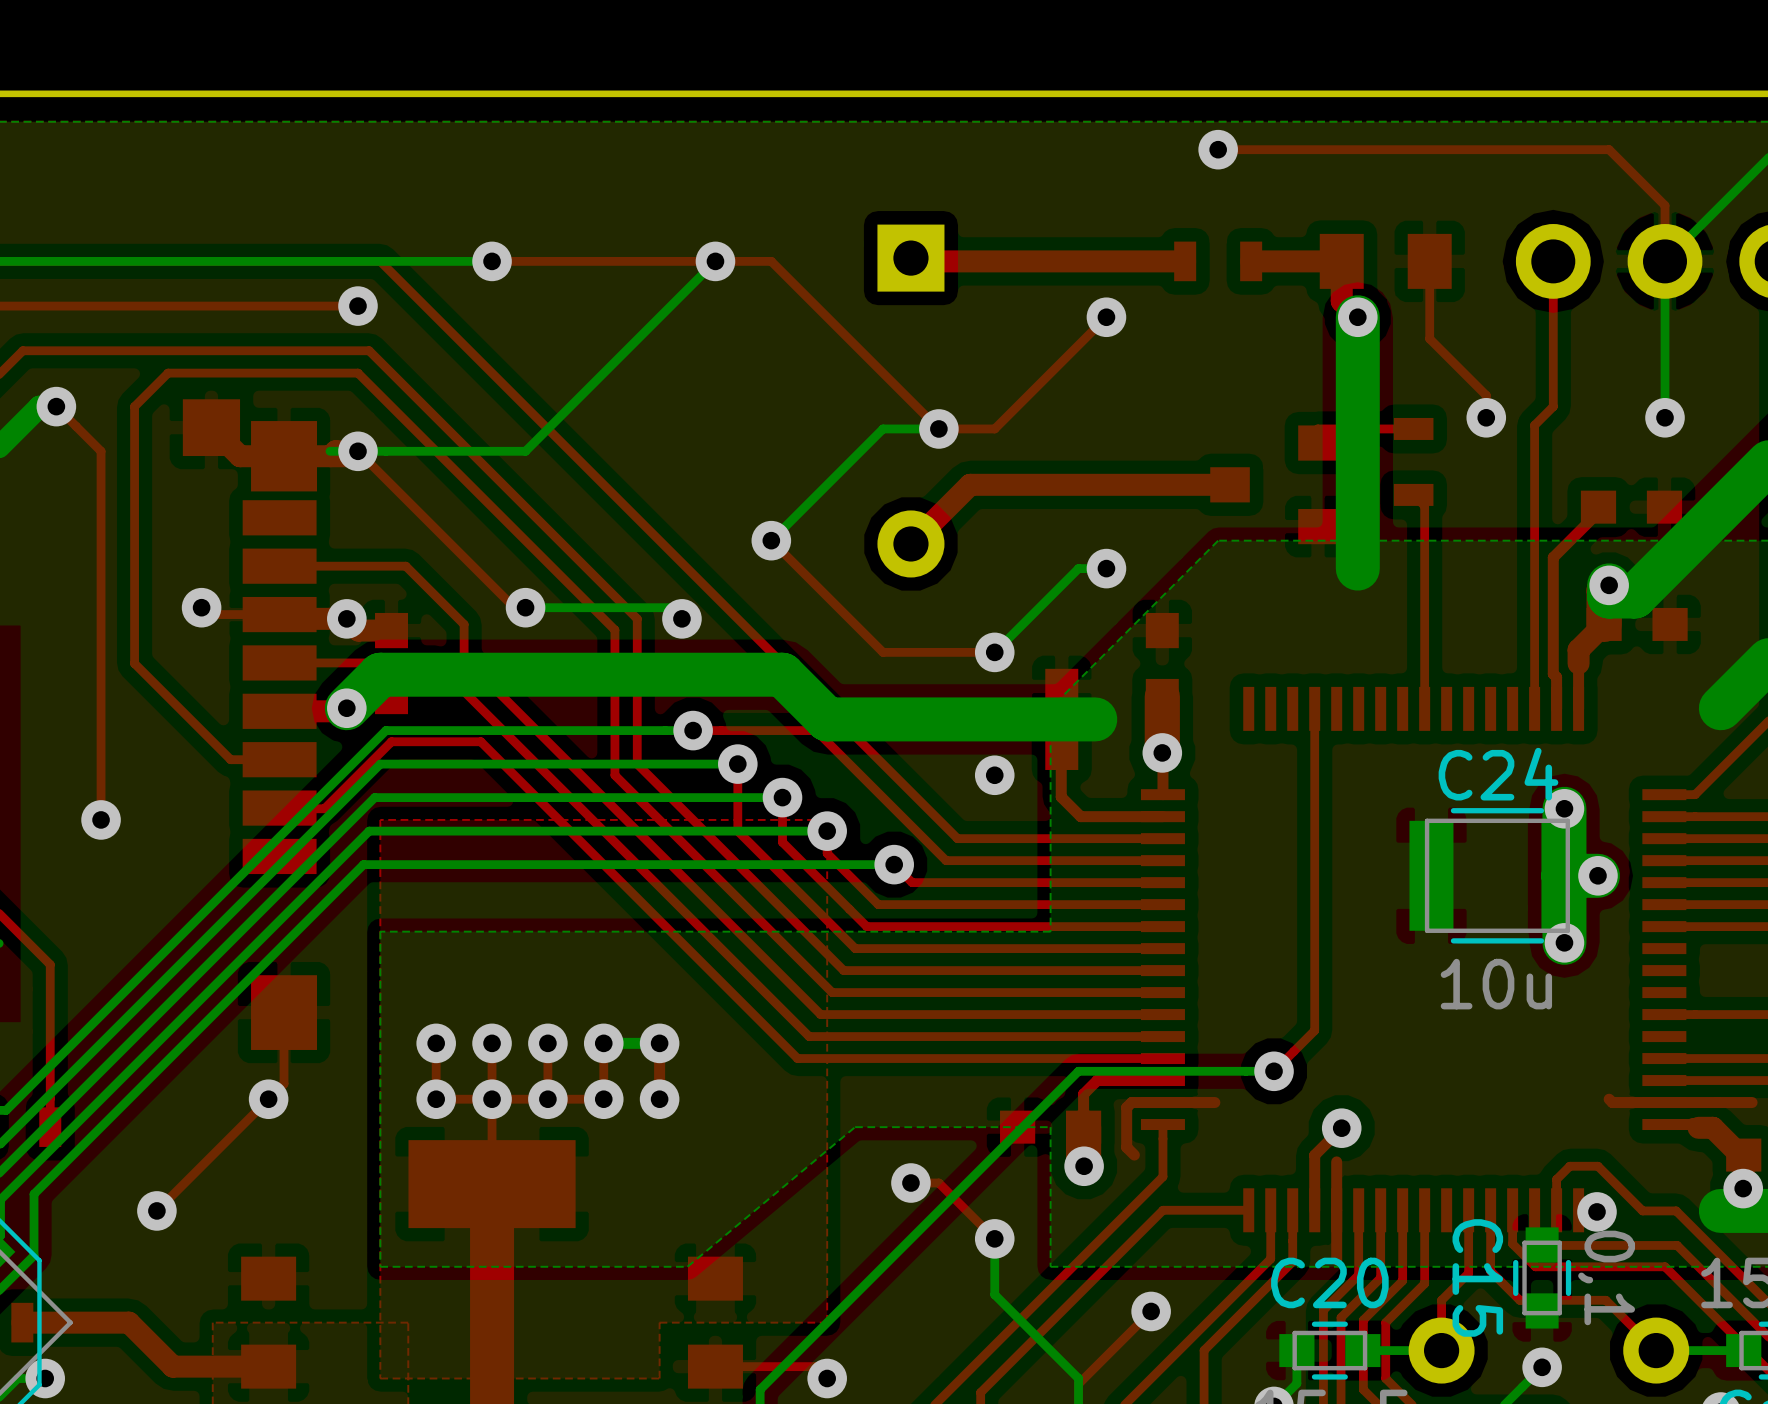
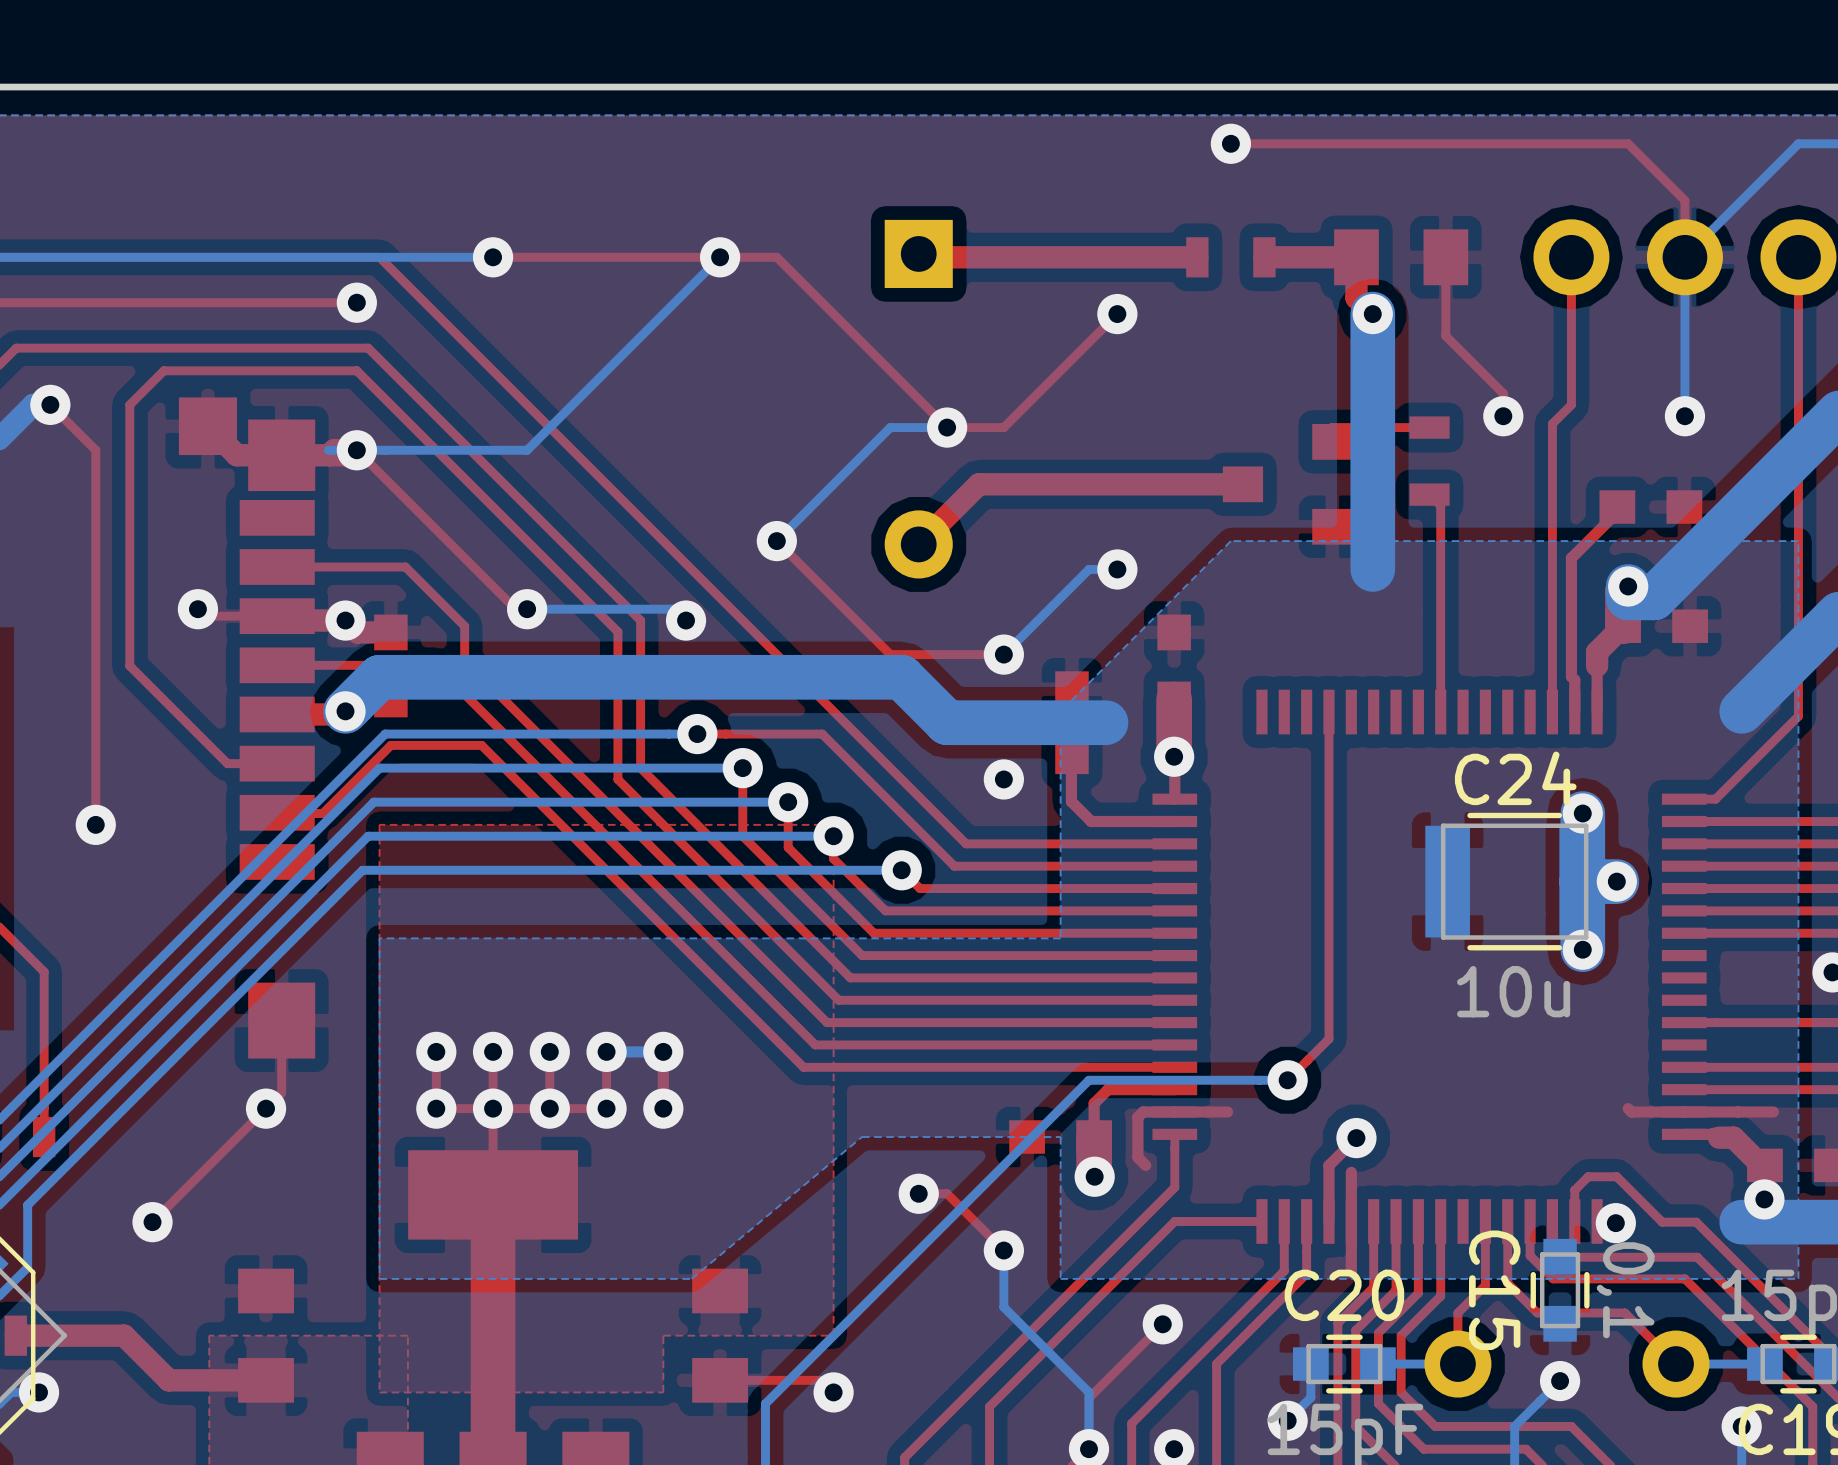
bottom track: (782, 674) (827, 719) (938, 719) -> (788, 677) (901, 677) (947, 722)

